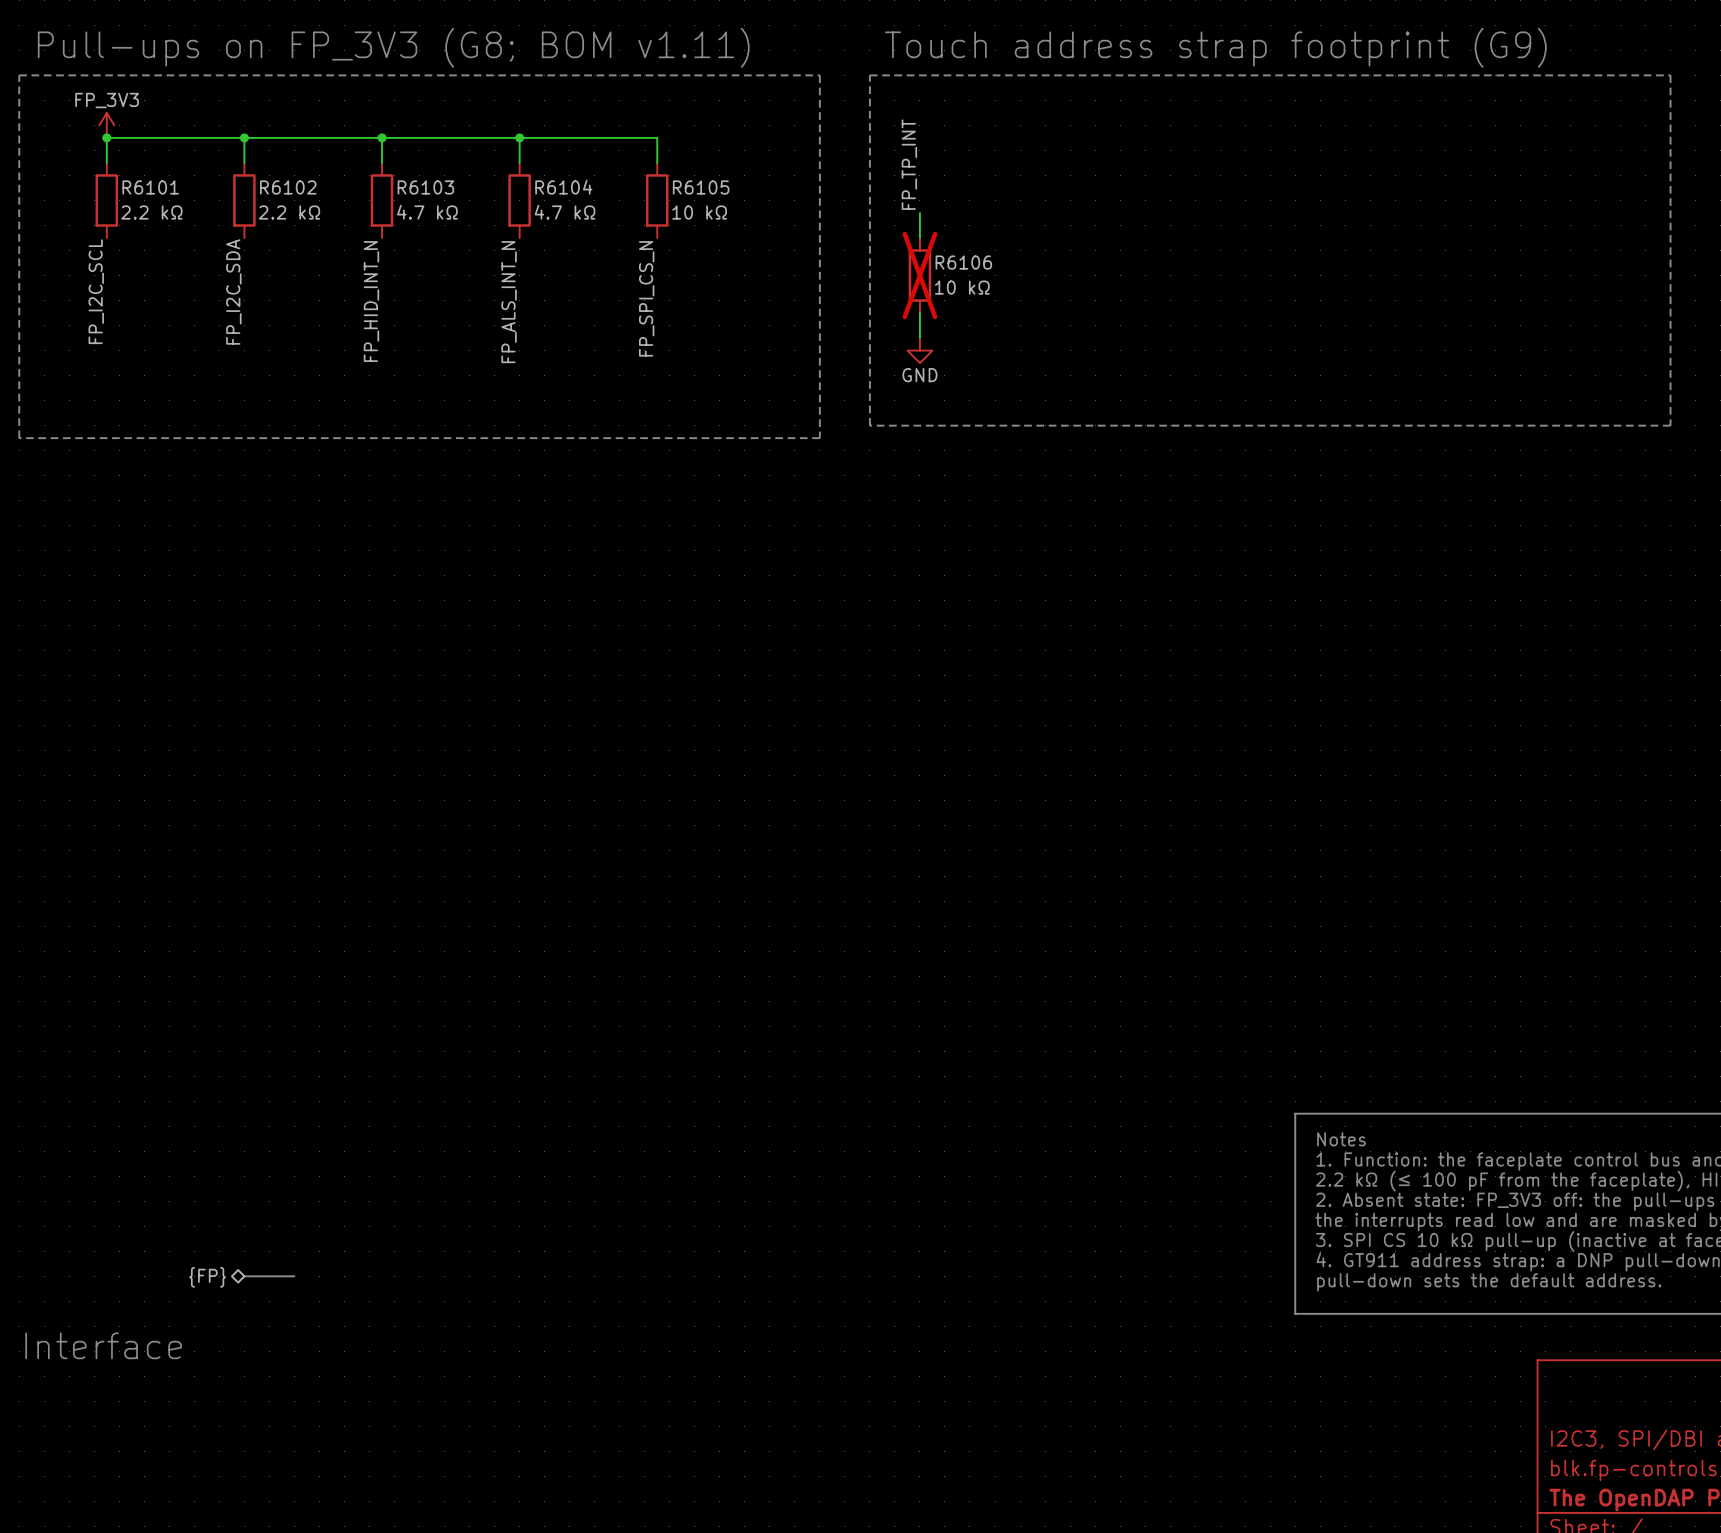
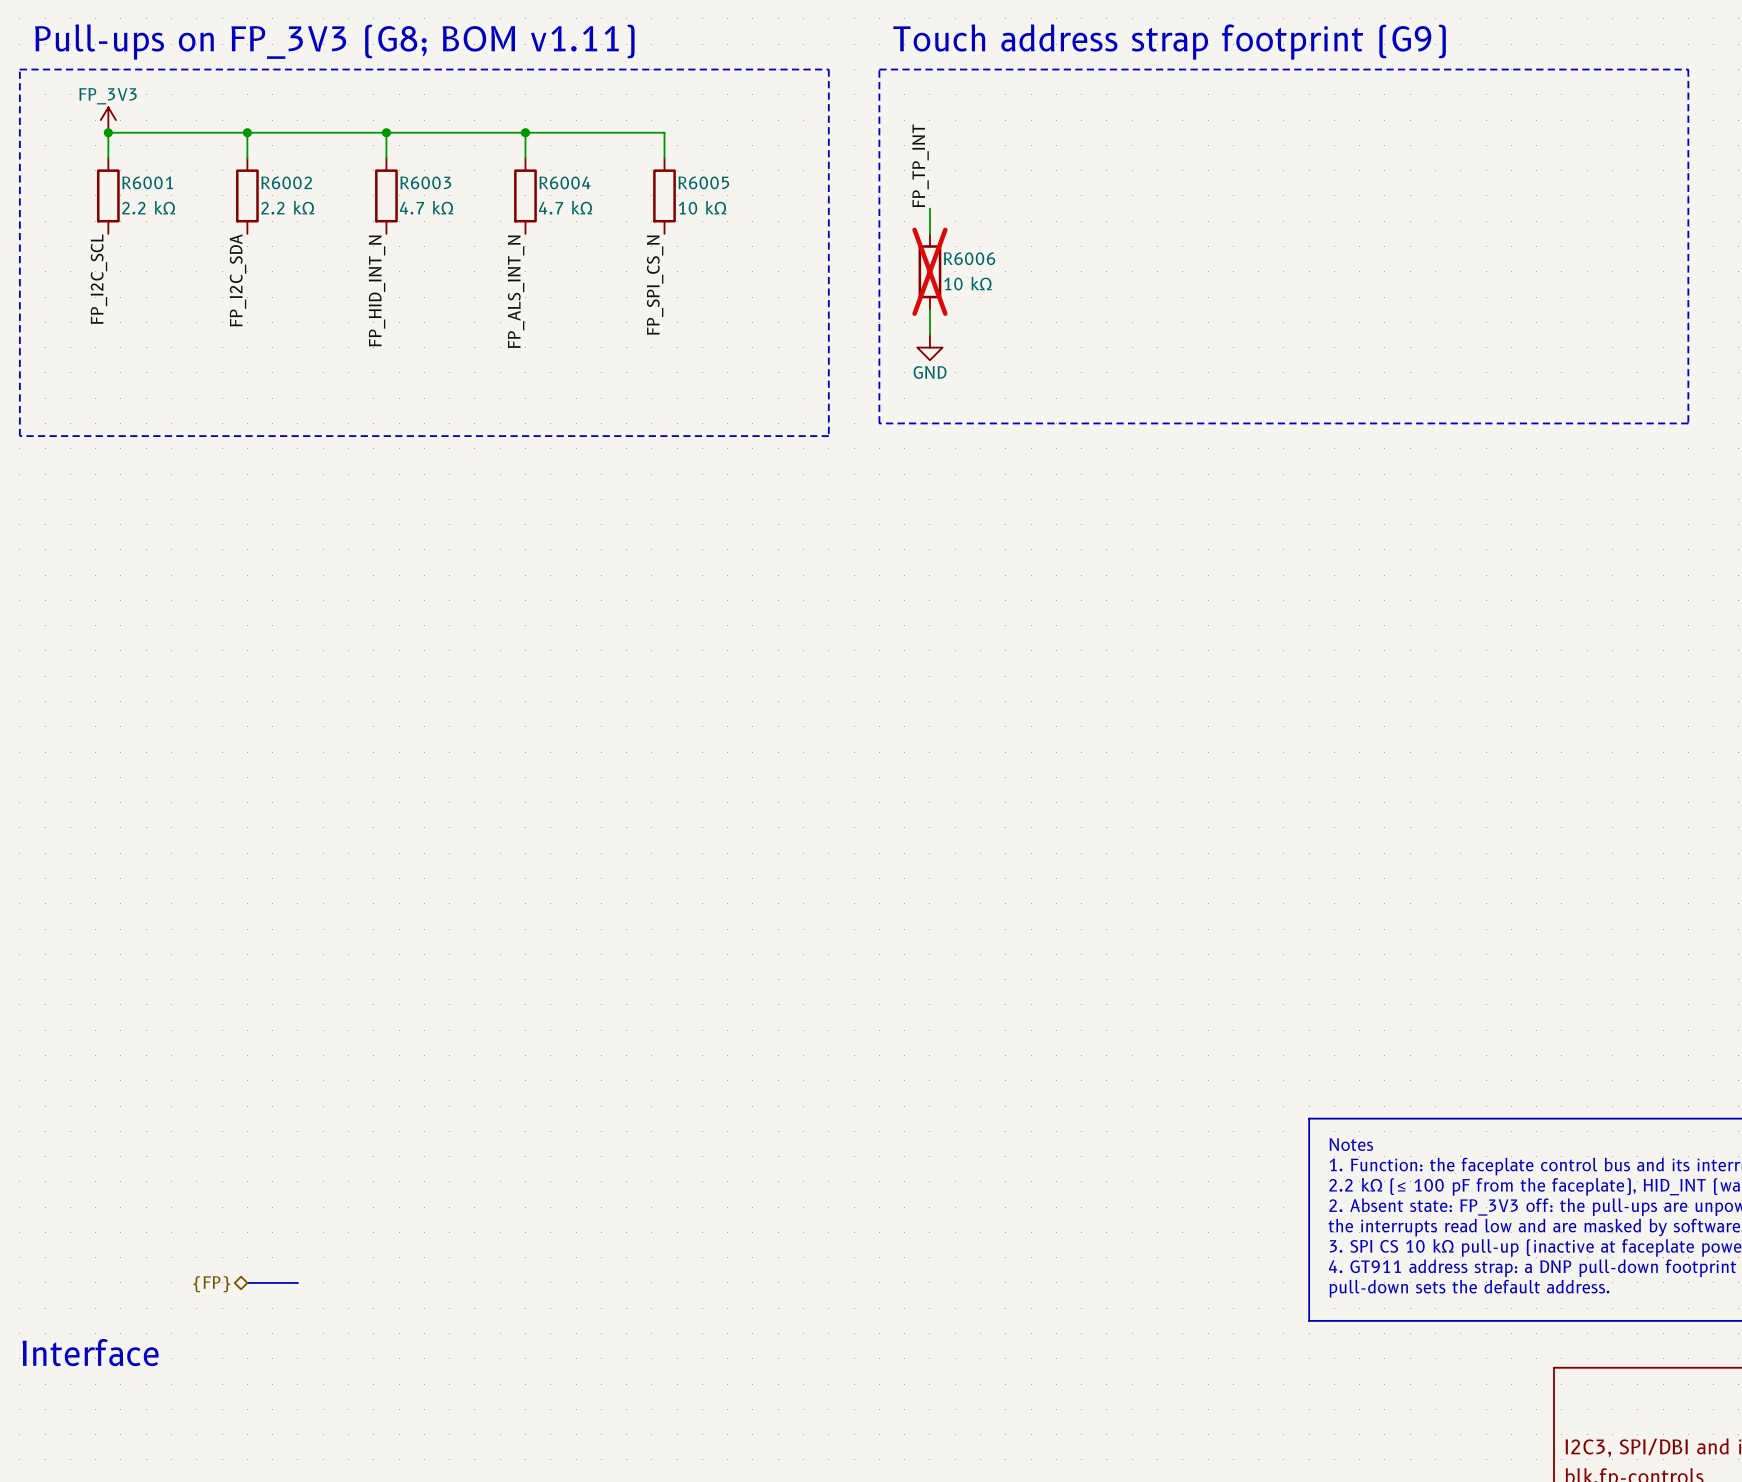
R6101 name: R6101 (150, 187) -> R6001 (147, 182)
R6102 name: R6102 (288, 187) -> R6002 (286, 182)
R6103 name: R6103 (425, 187) -> R6003 (425, 182)
R6104 name: R6104 (563, 187) -> R6004 (564, 182)
R6105 name: R6105 (701, 187) -> R6005 (703, 182)
R6106 name: R6106 (963, 262) -> R6006 (969, 258)

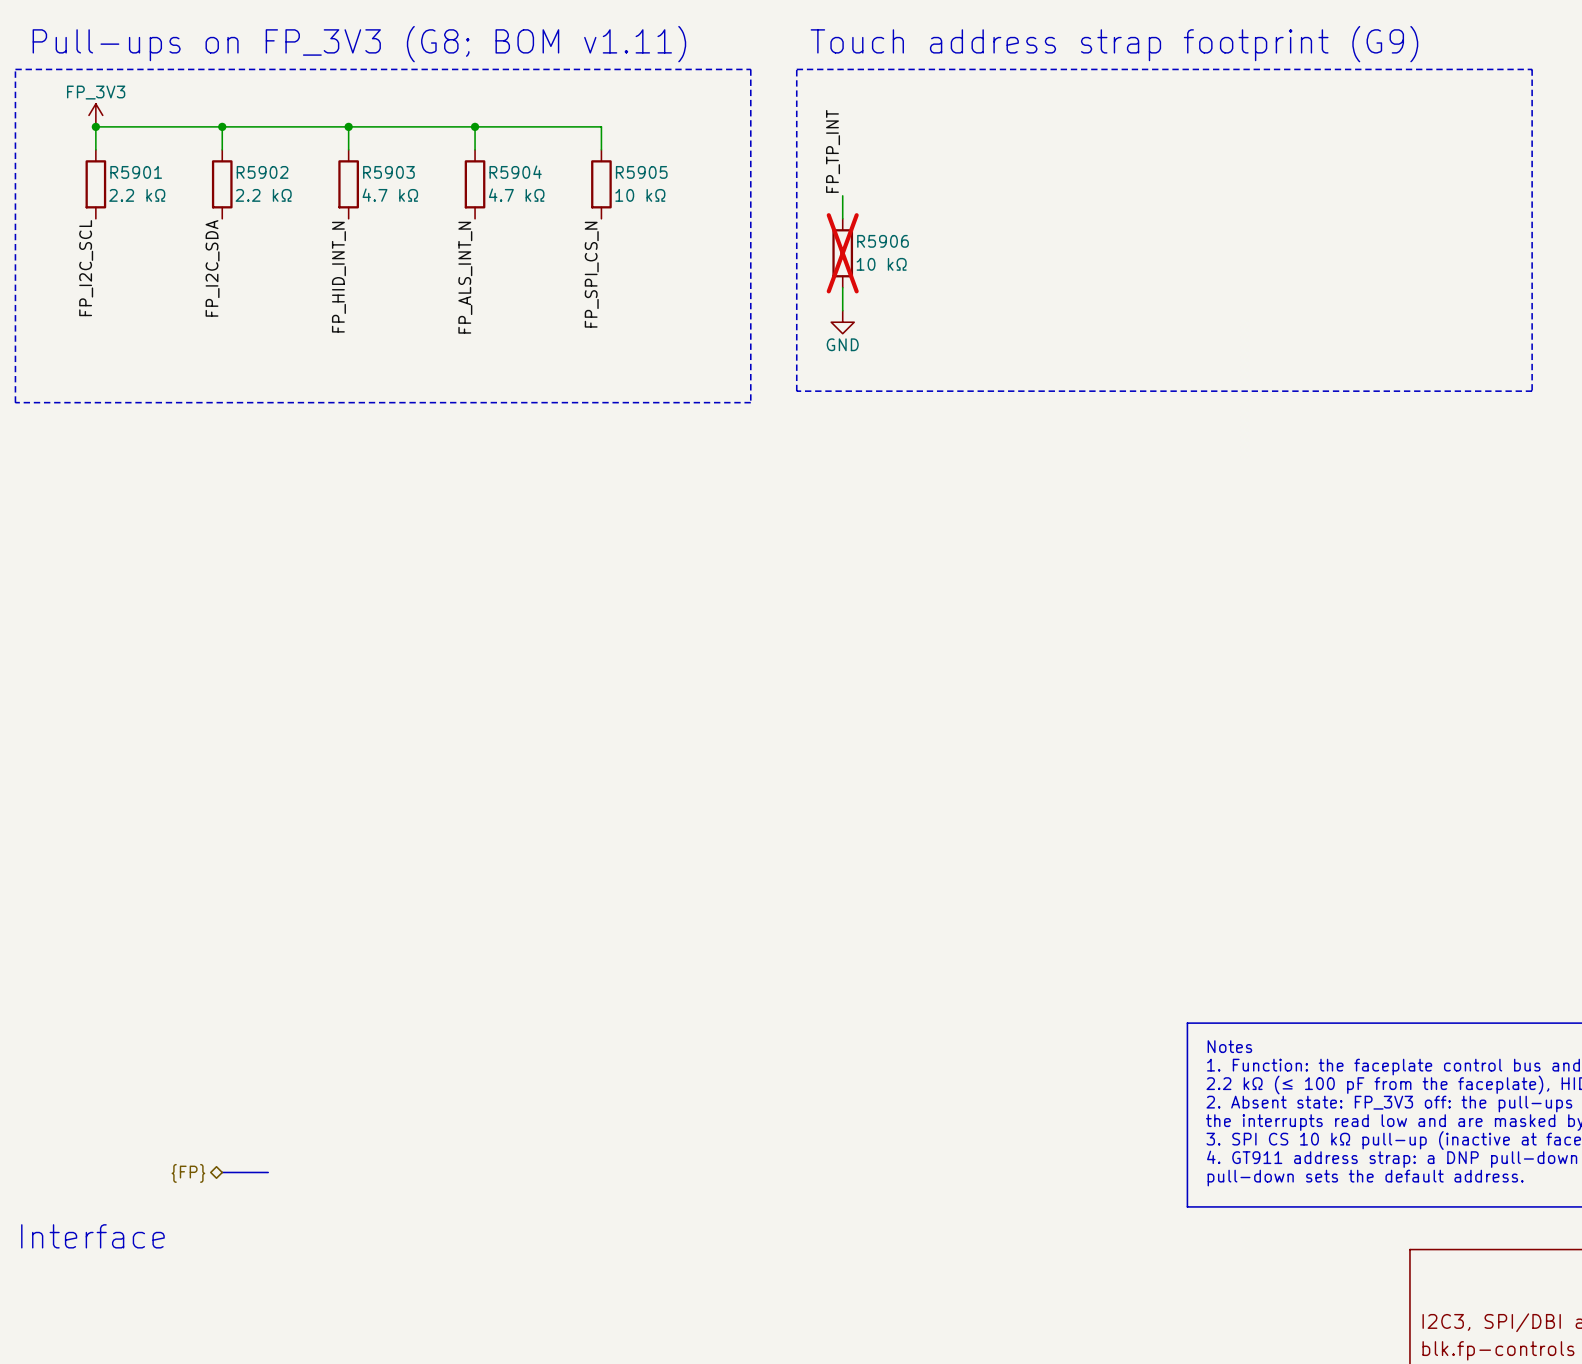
R6001 name: R6001 (147, 182) -> R5901 (136, 172)
R6002 name: R6002 (286, 182) -> R5902 (262, 172)
R6003 name: R6003 (425, 182) -> R5903 (388, 172)
R6004 name: R6004 (564, 182) -> R5904 (515, 172)
R6005 name: R6005 (703, 182) -> R5905 (641, 172)
R6006 name: R6006 (969, 258) -> R5906 (883, 241)

